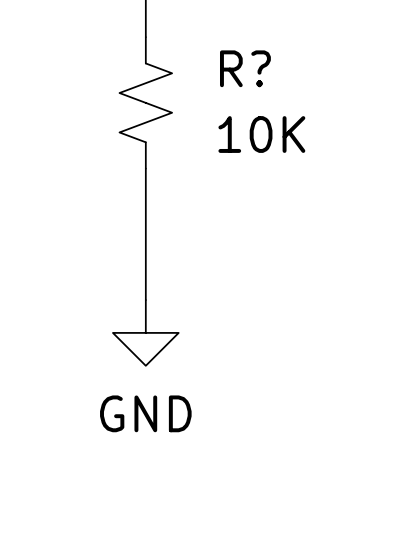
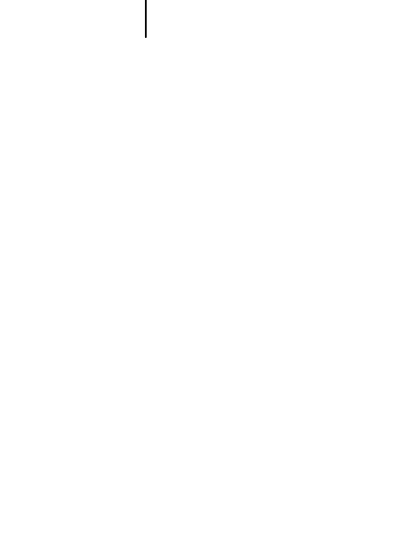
R?: 10K (145, 102) -> none
wire: (145, 168) (145, 300) -> none
power symbol: GND (145, 332) -> none

